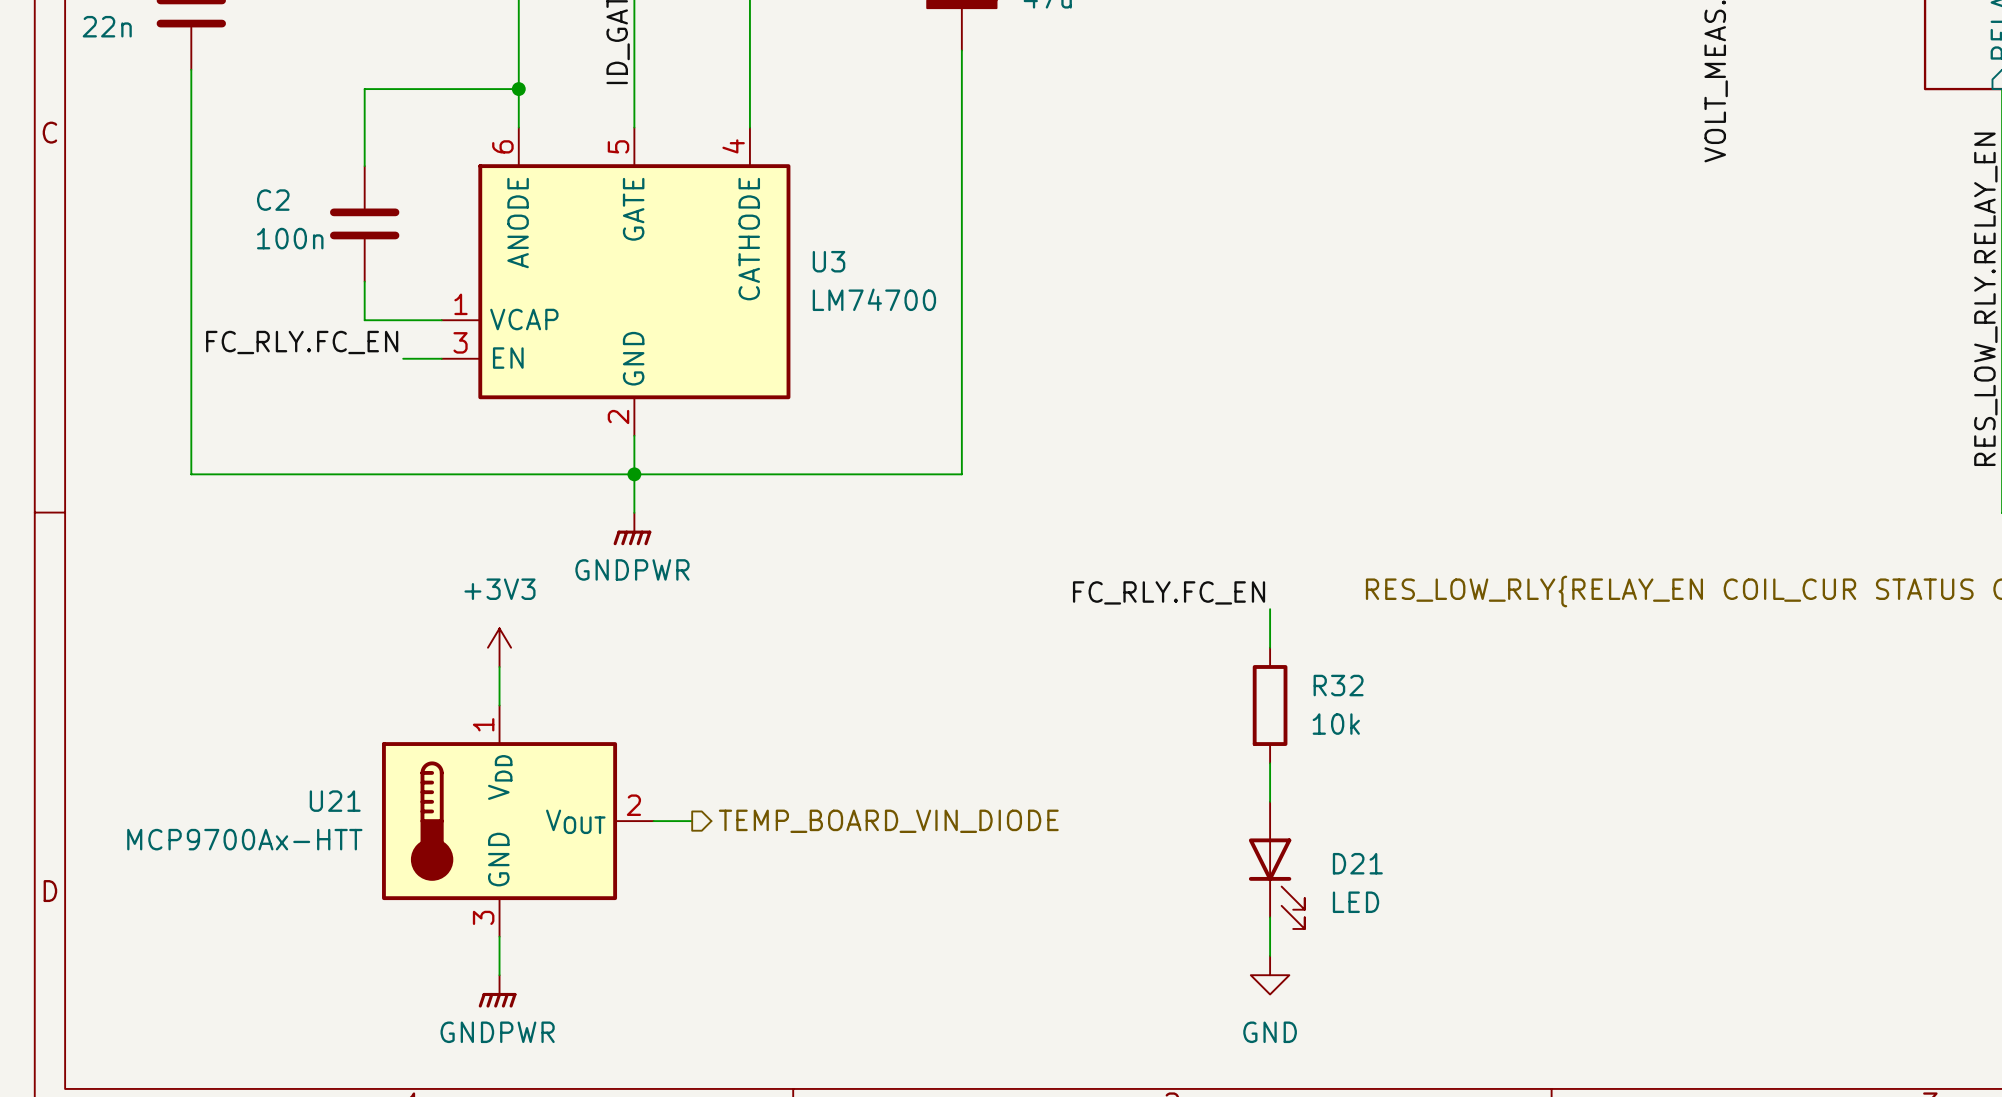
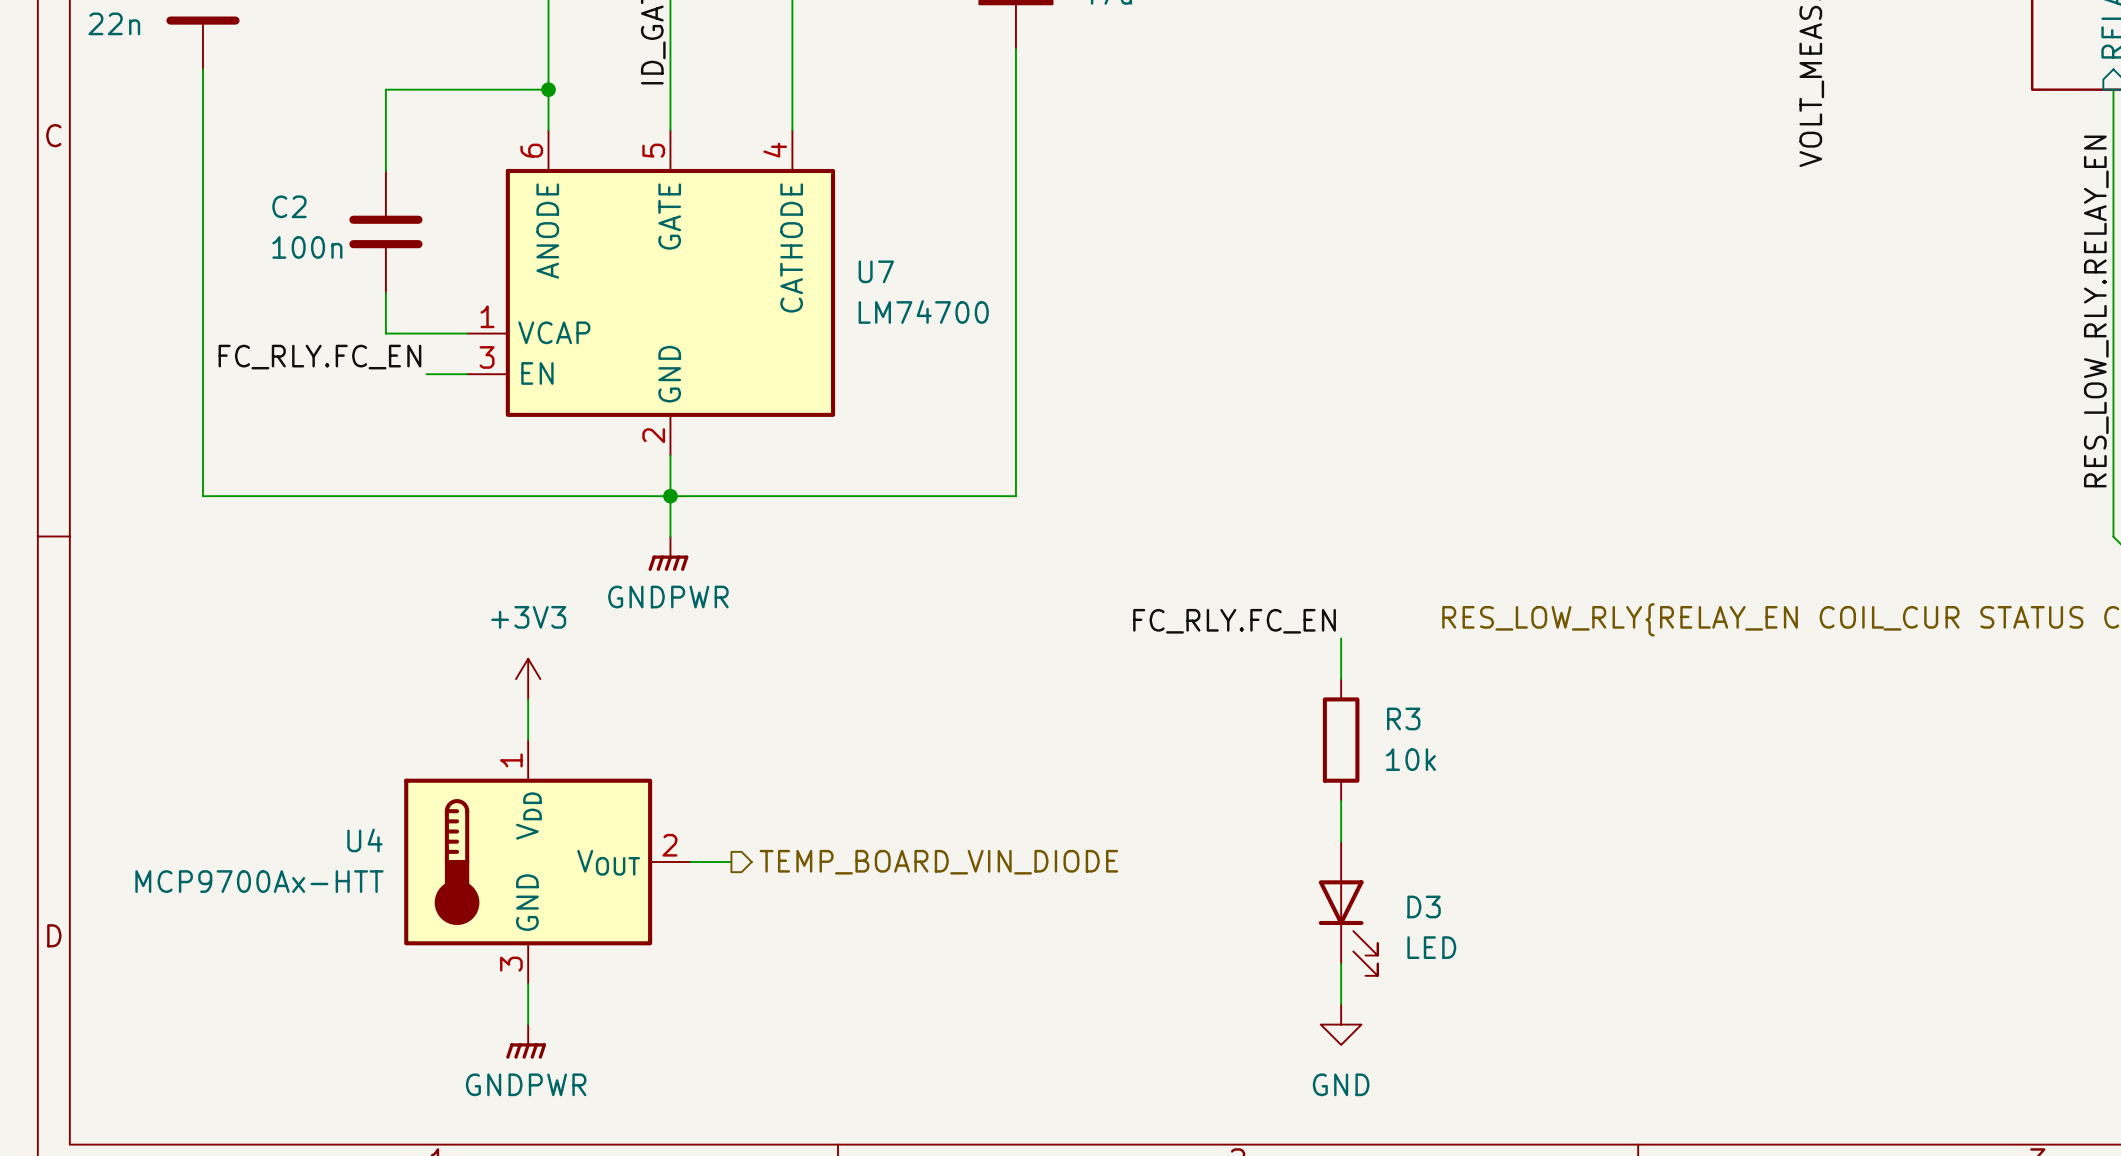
U3 name: U3 (828, 261) -> U7 (876, 271)
R32 name: R32 (1338, 685) -> R3 (1403, 718)
U21 name: U21 (335, 801) -> U4 (364, 840)
D21 name: D21 (1357, 863) -> D3 (1424, 906)

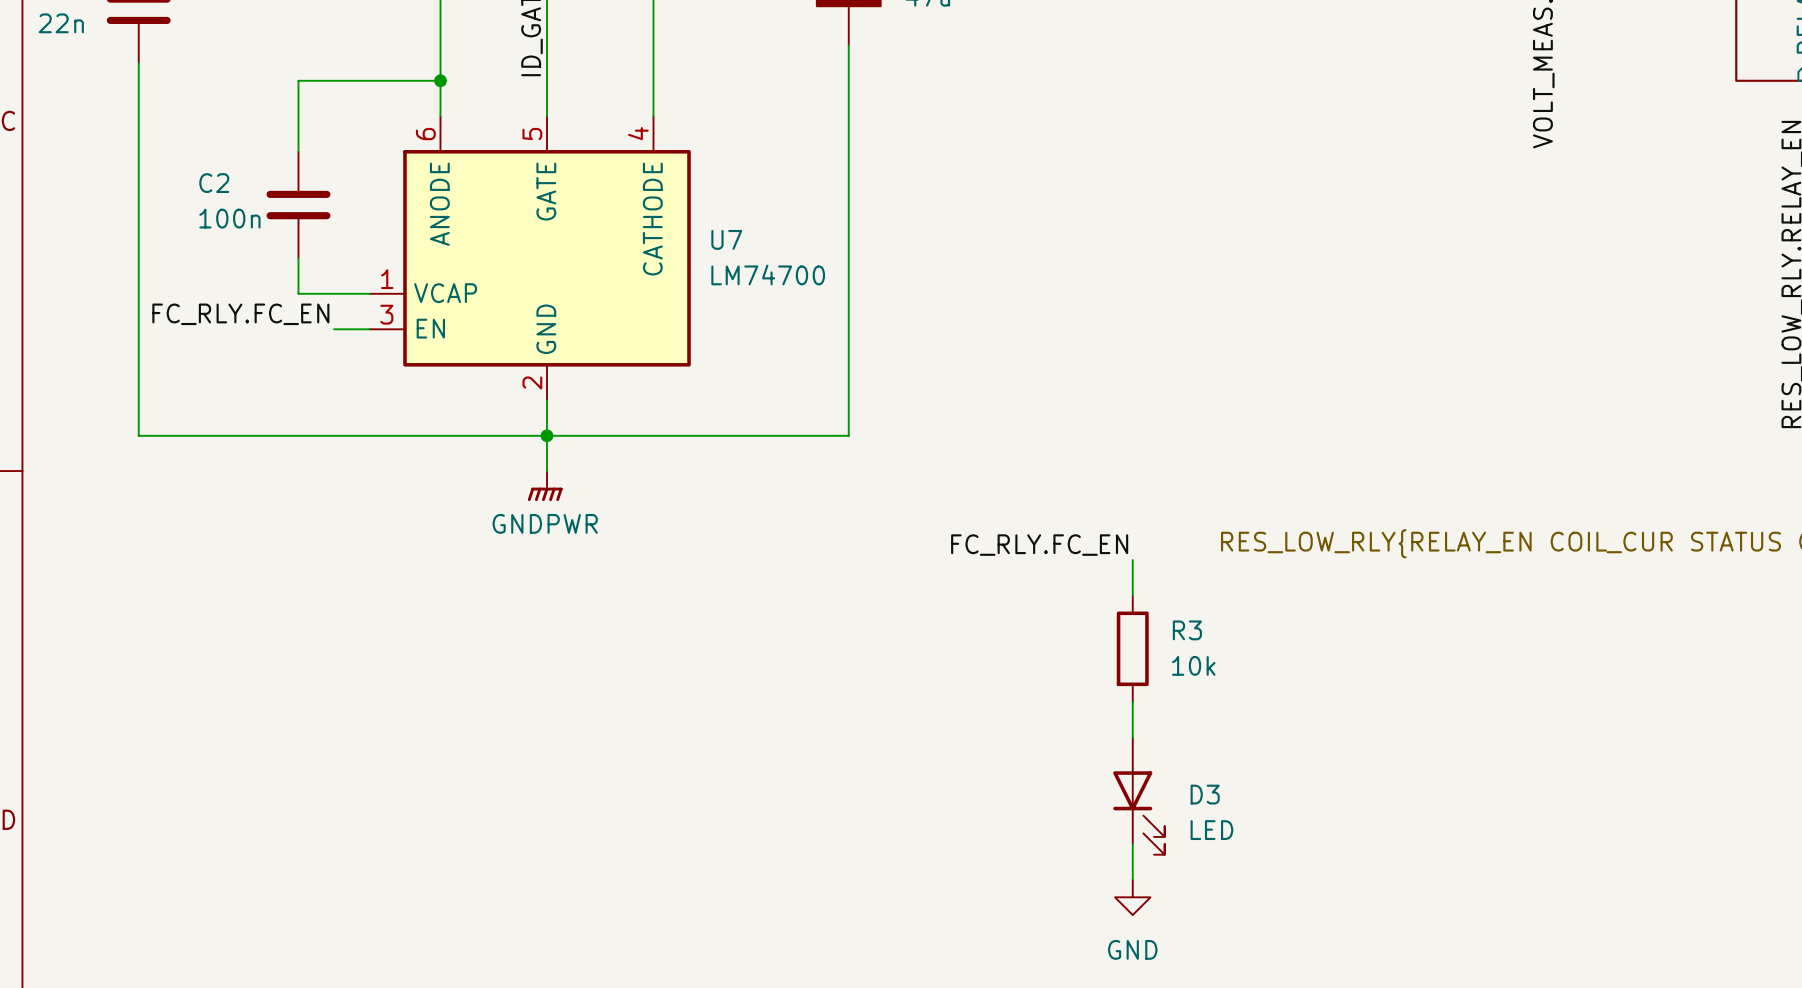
power symbol: +3V3 (528, 679) -> none
wire: (528, 699) (528, 740) -> none
U4: MCP9700Ax-HTT (547, 862) -> none
wire: (690, 862) (731, 862) -> none
hierarchical label: TEMP_BOARD_VIN_DIODE (938, 862) -> none
wire: (528, 983) (528, 1024) -> none
power symbol: GNDPWR (526, 1041) -> none

